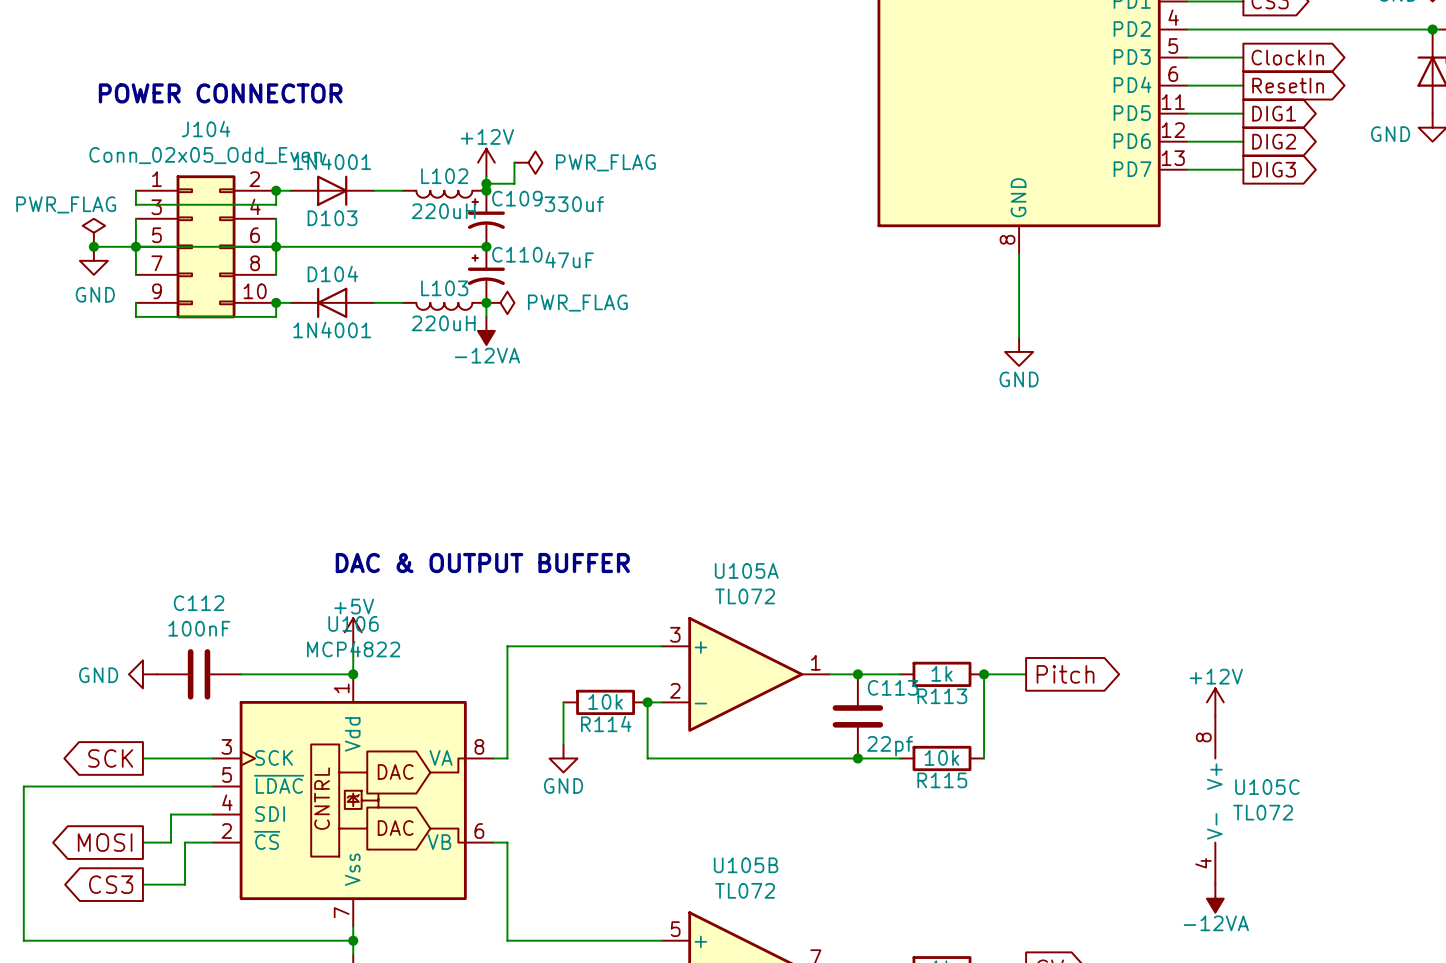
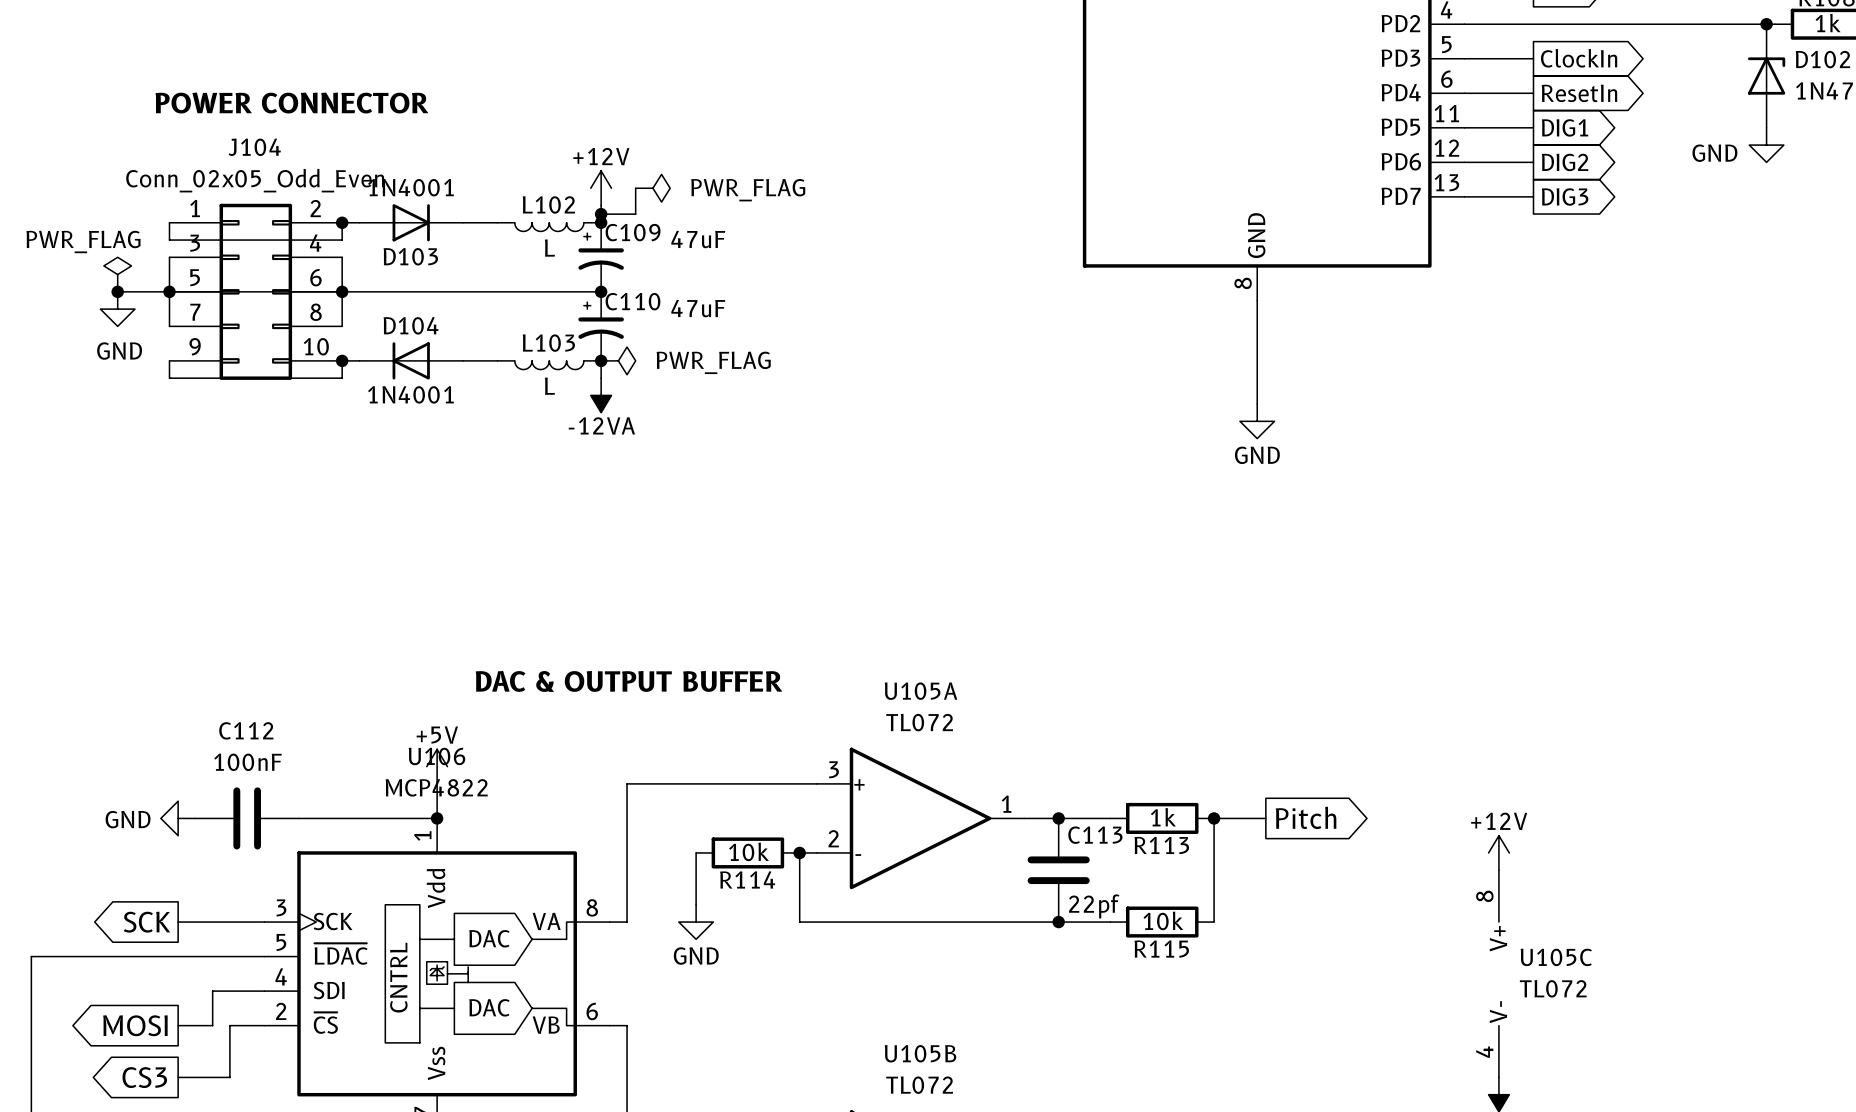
C109 value: 330uf (574, 204) -> 47uF (698, 239)
L102 value: 220uH (443, 211) -> L (549, 248)
L103 value: 220uH (443, 323) -> L (549, 386)

